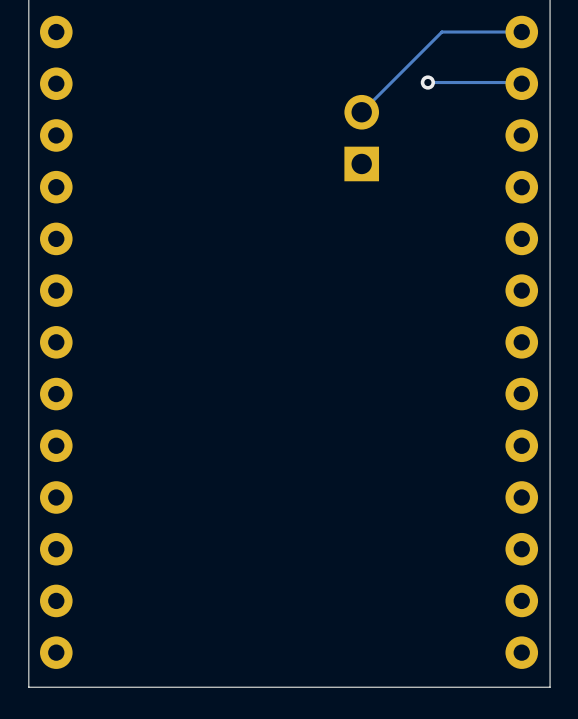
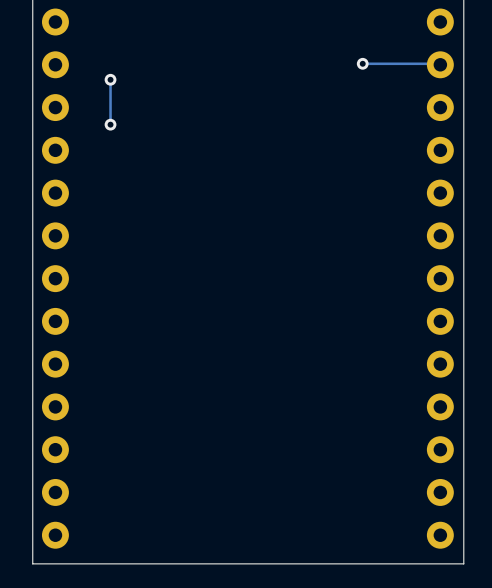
track: (521, 32) (441, 32) (361, 112) -> none
track: none -> (110, 79) (110, 124)
via: none -> (110, 79)
part: (361, 138) -> none
via: none -> (110, 124)

